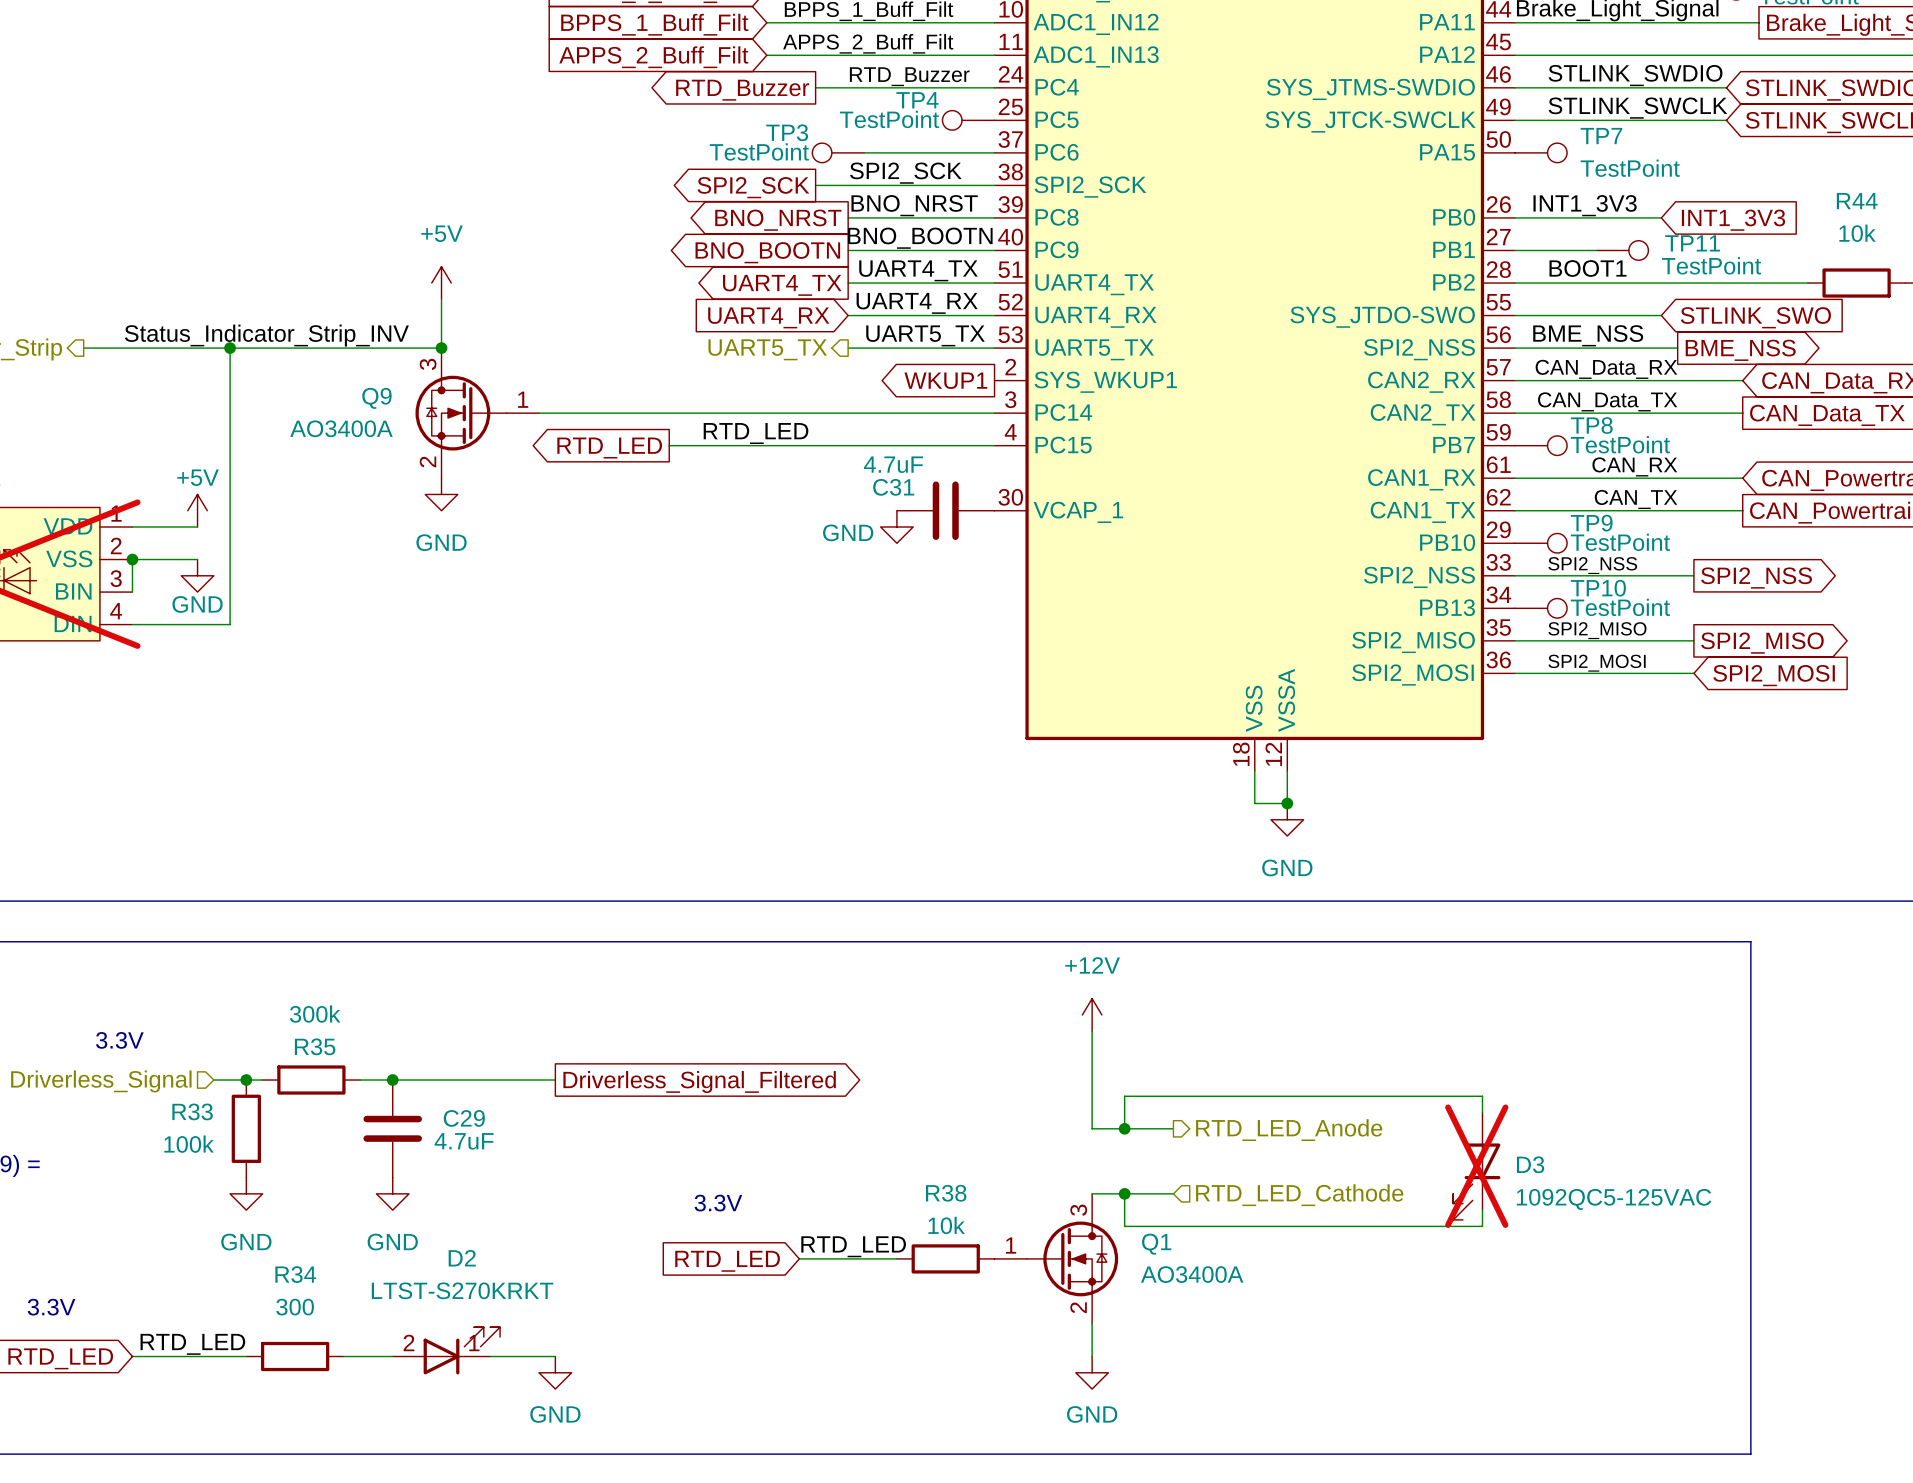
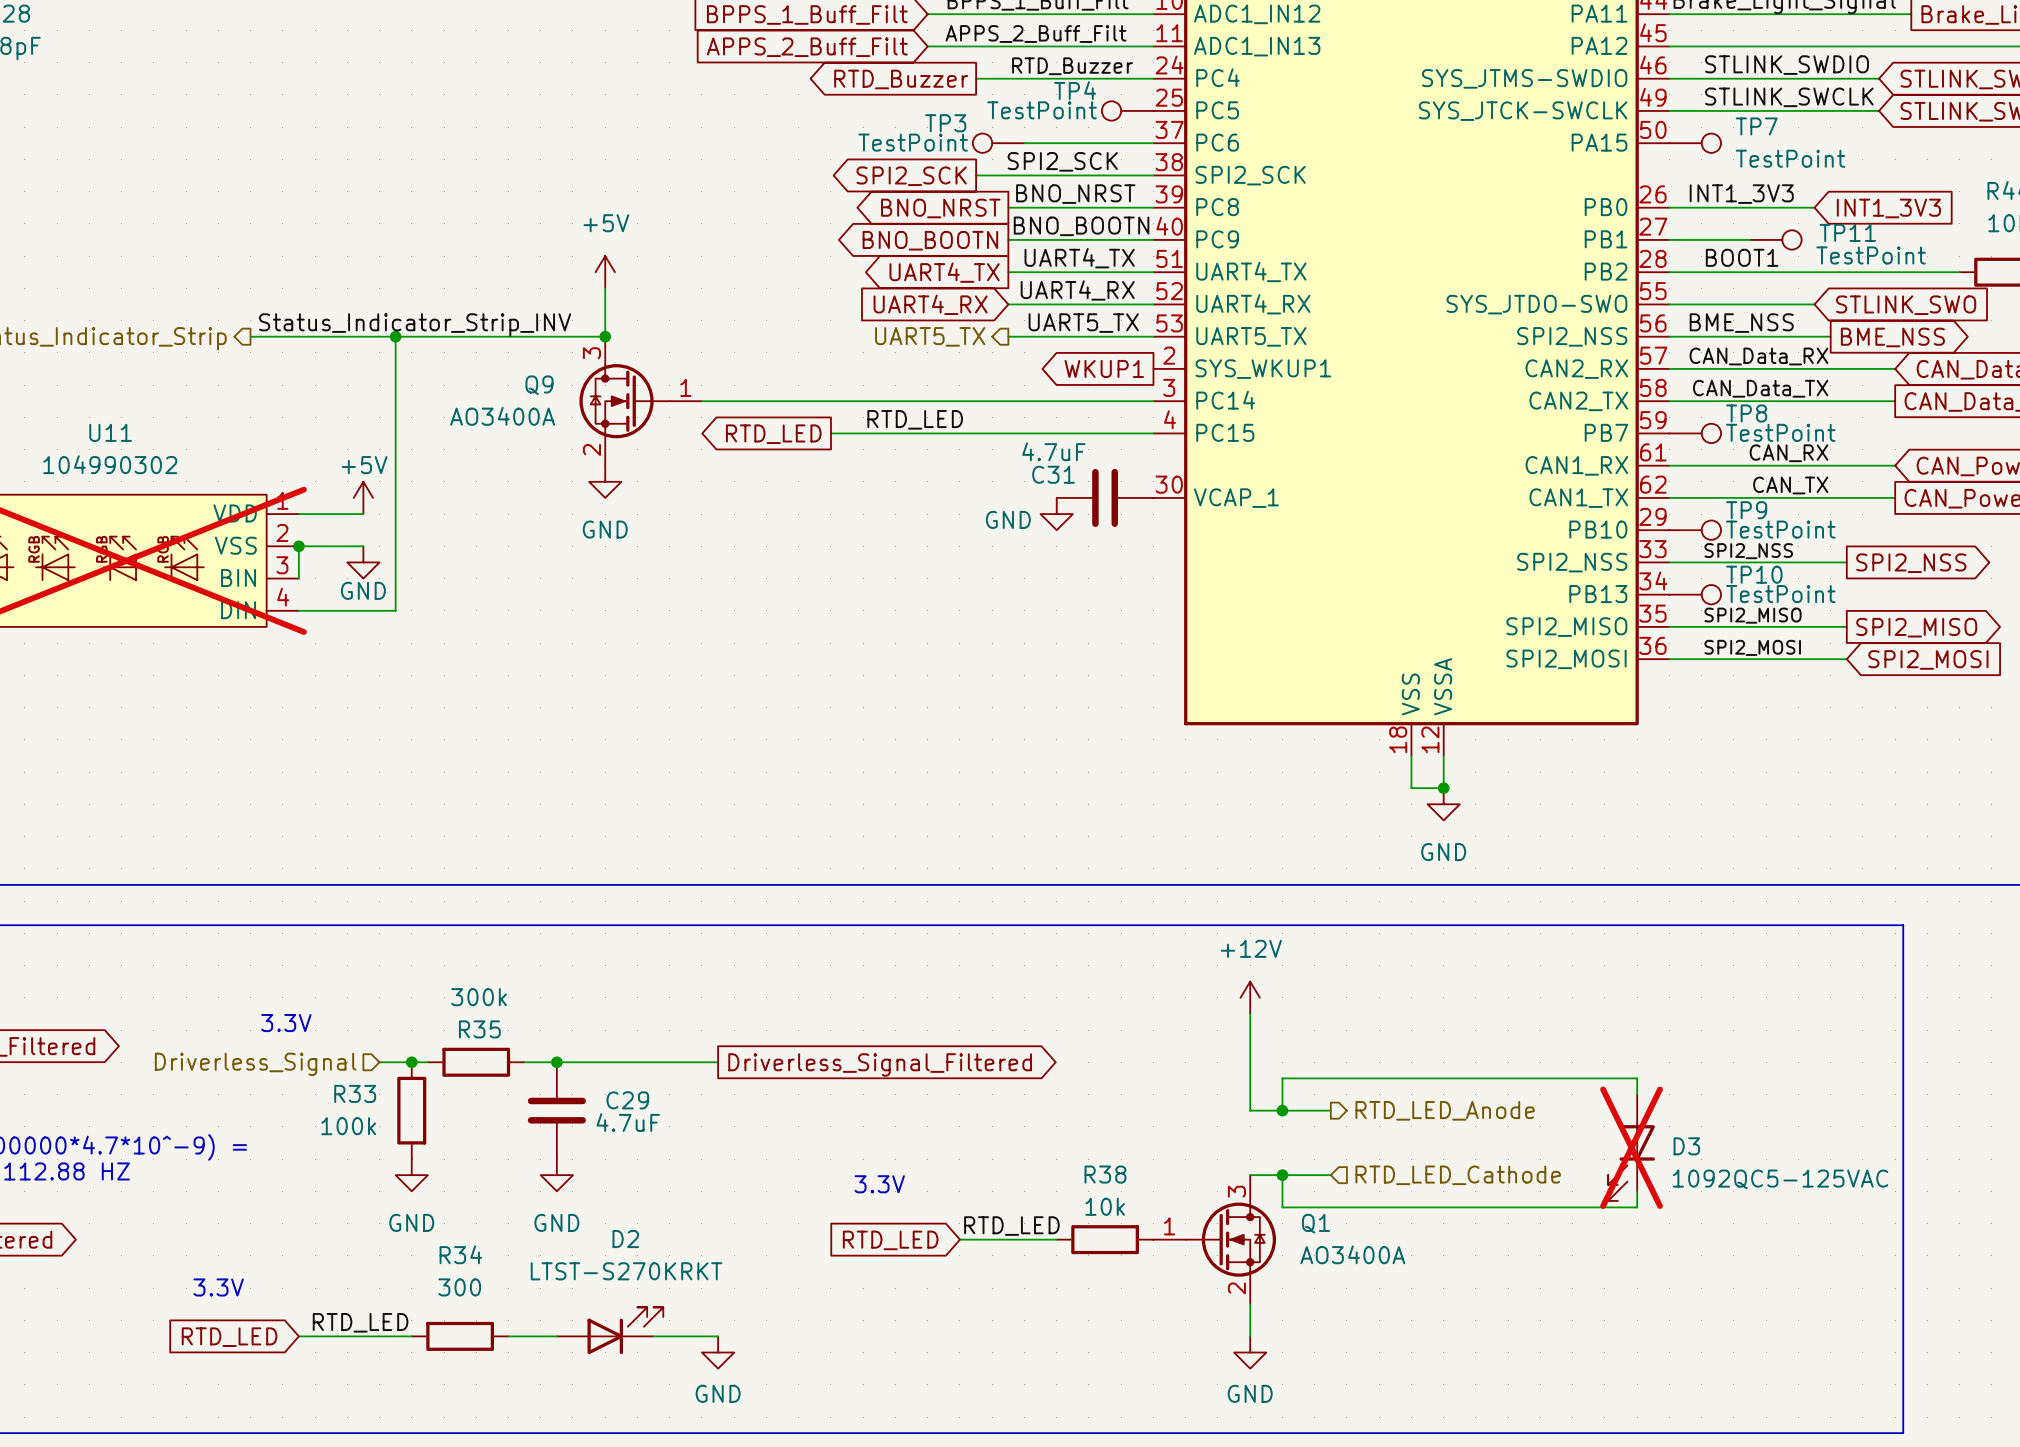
D2 pin number: 2 (408, 1342) -> none
D2 pin number: 1 (474, 1343) -> none

